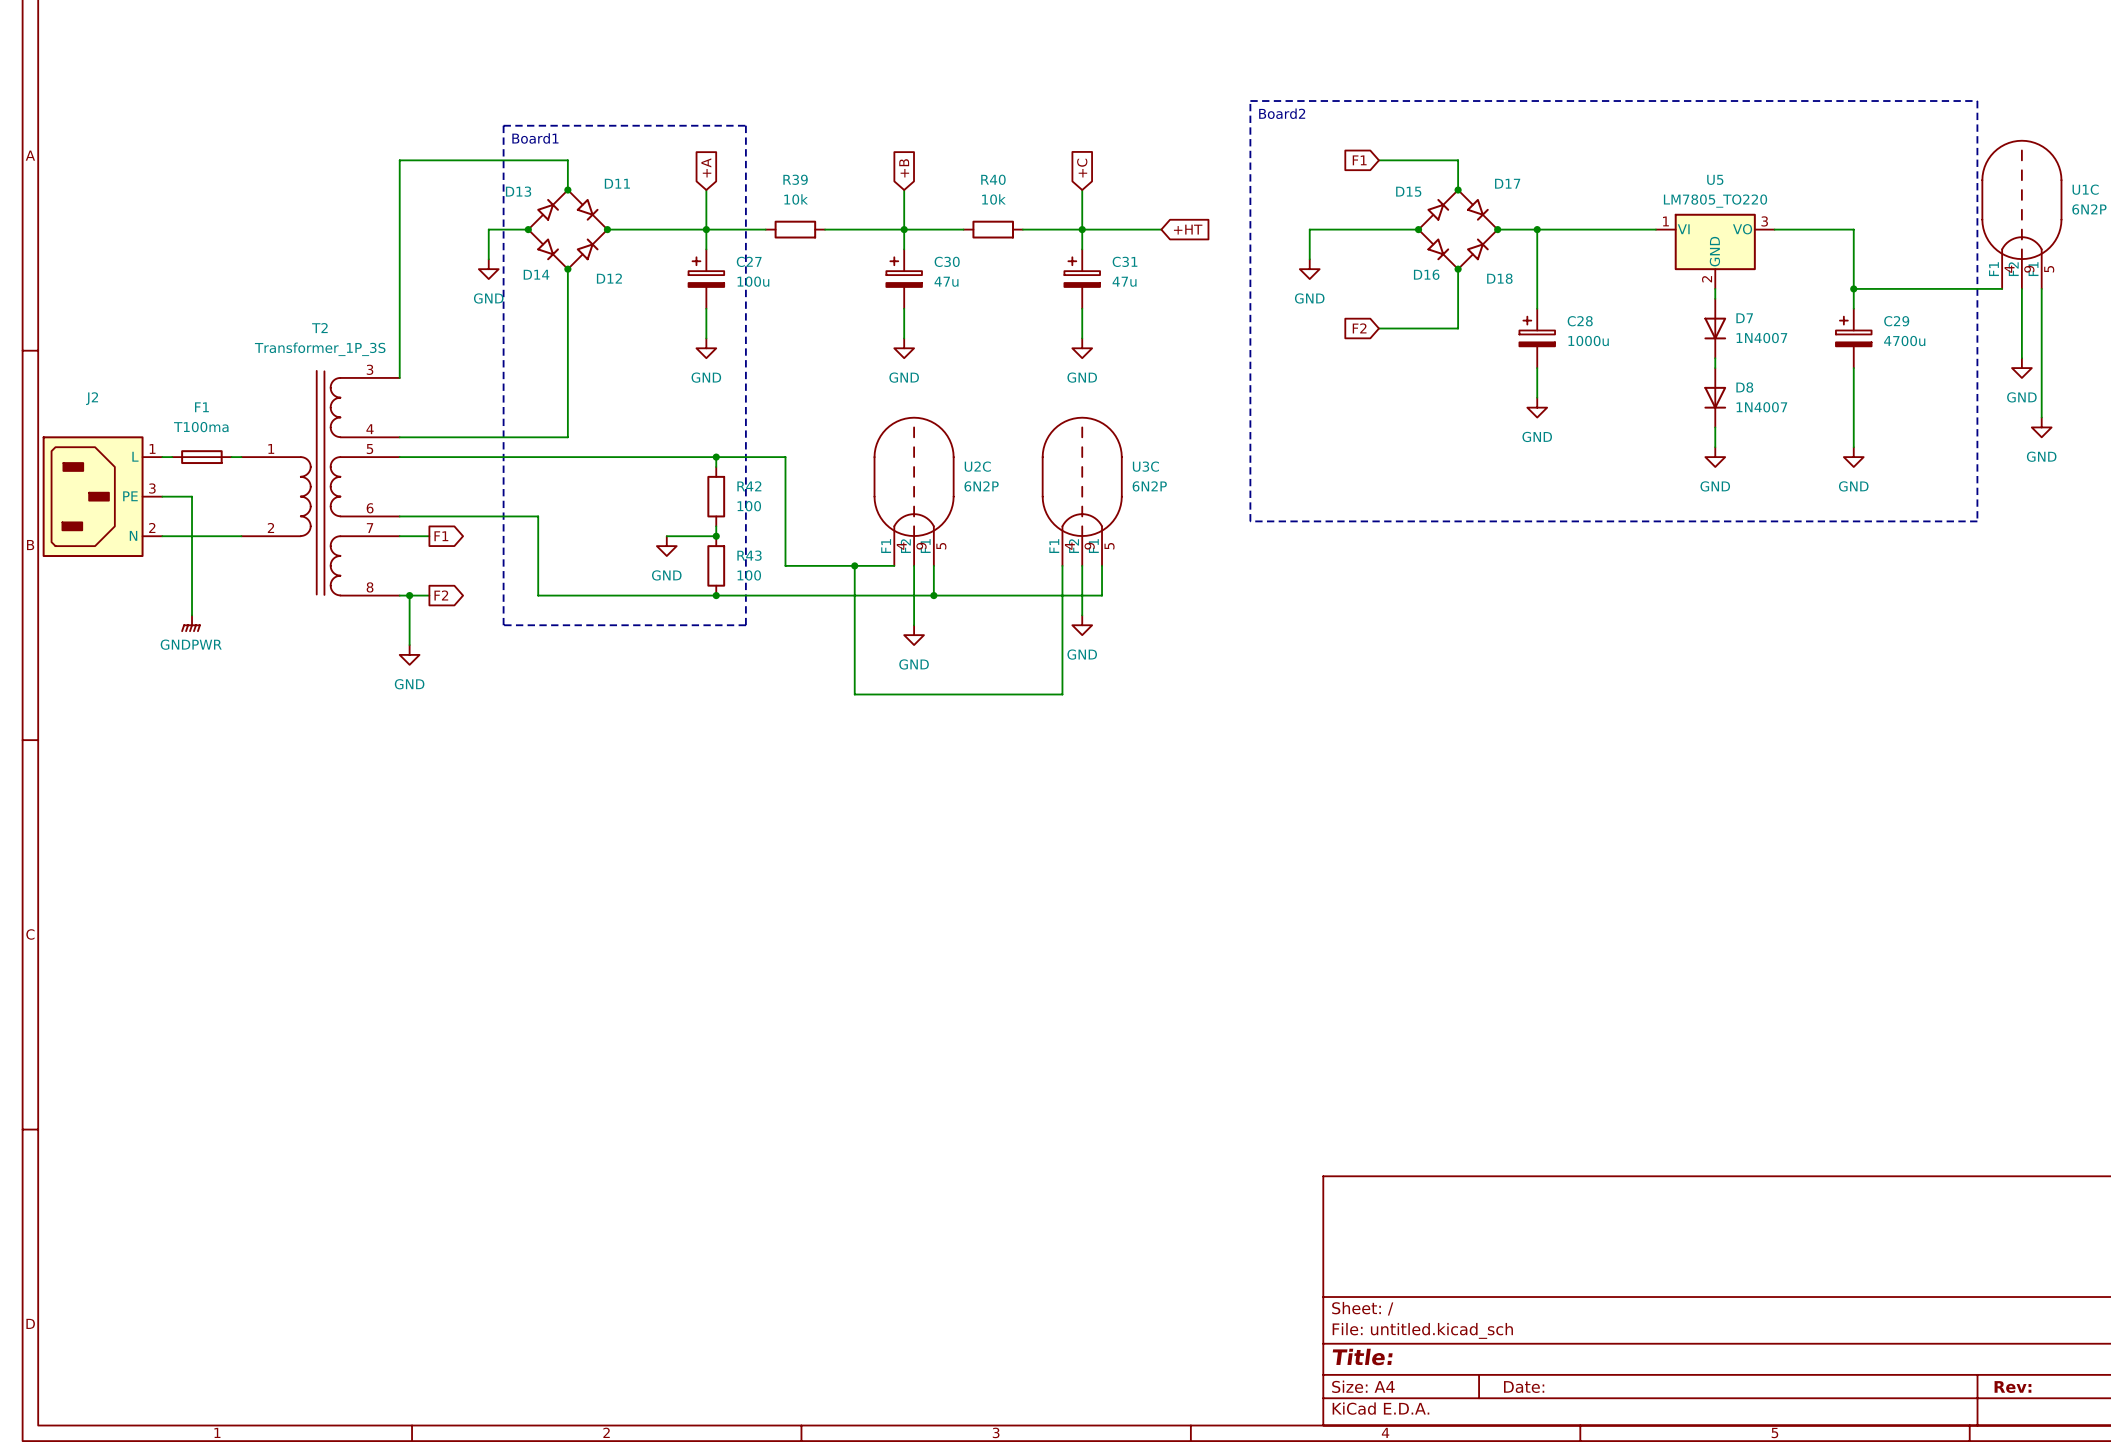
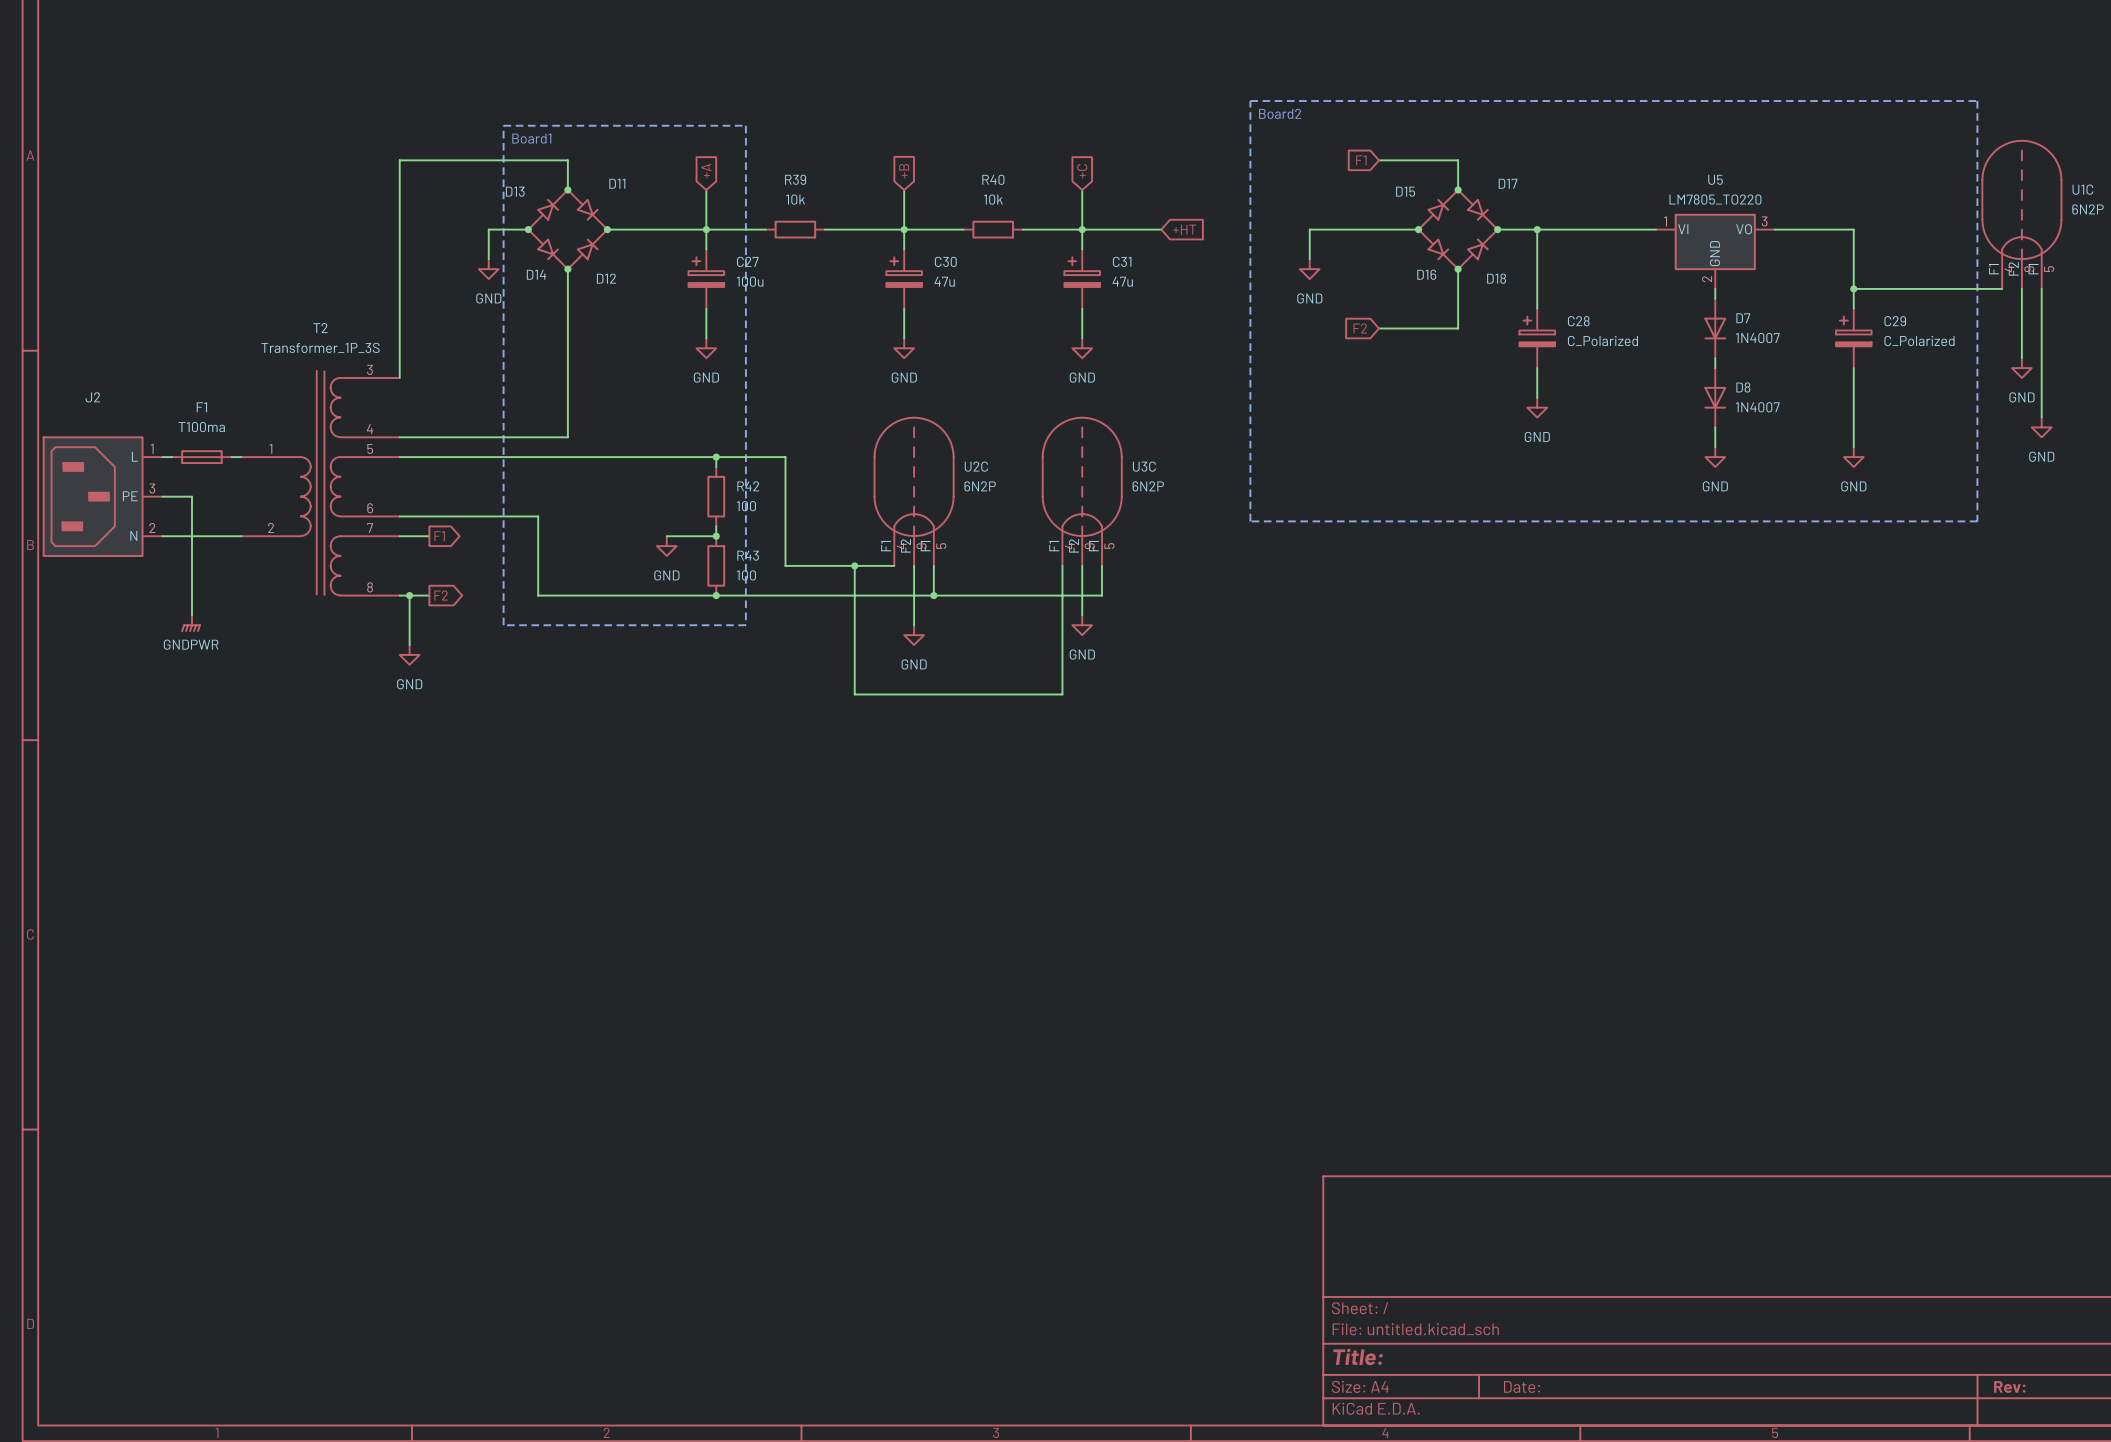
C28 value: 1000u (1588, 341) -> C_Polarized (1602, 340)
C29 value: 4700u (1904, 341) -> C_Polarized (1919, 340)

